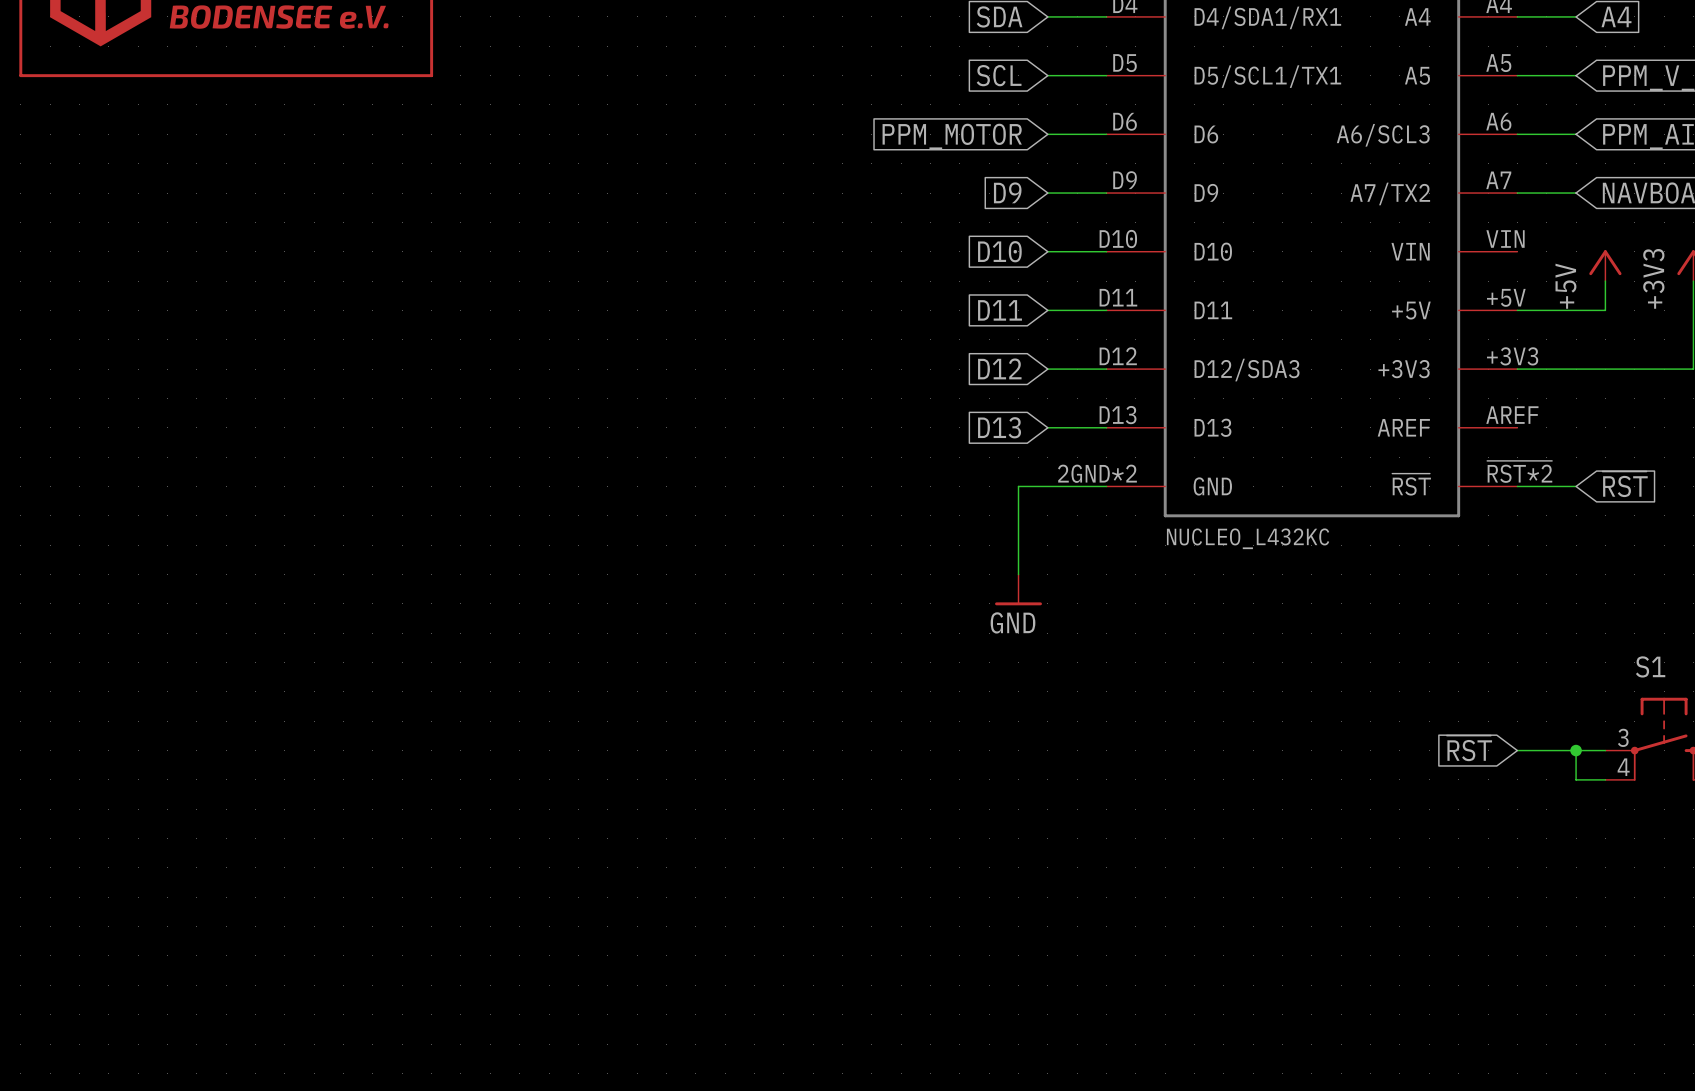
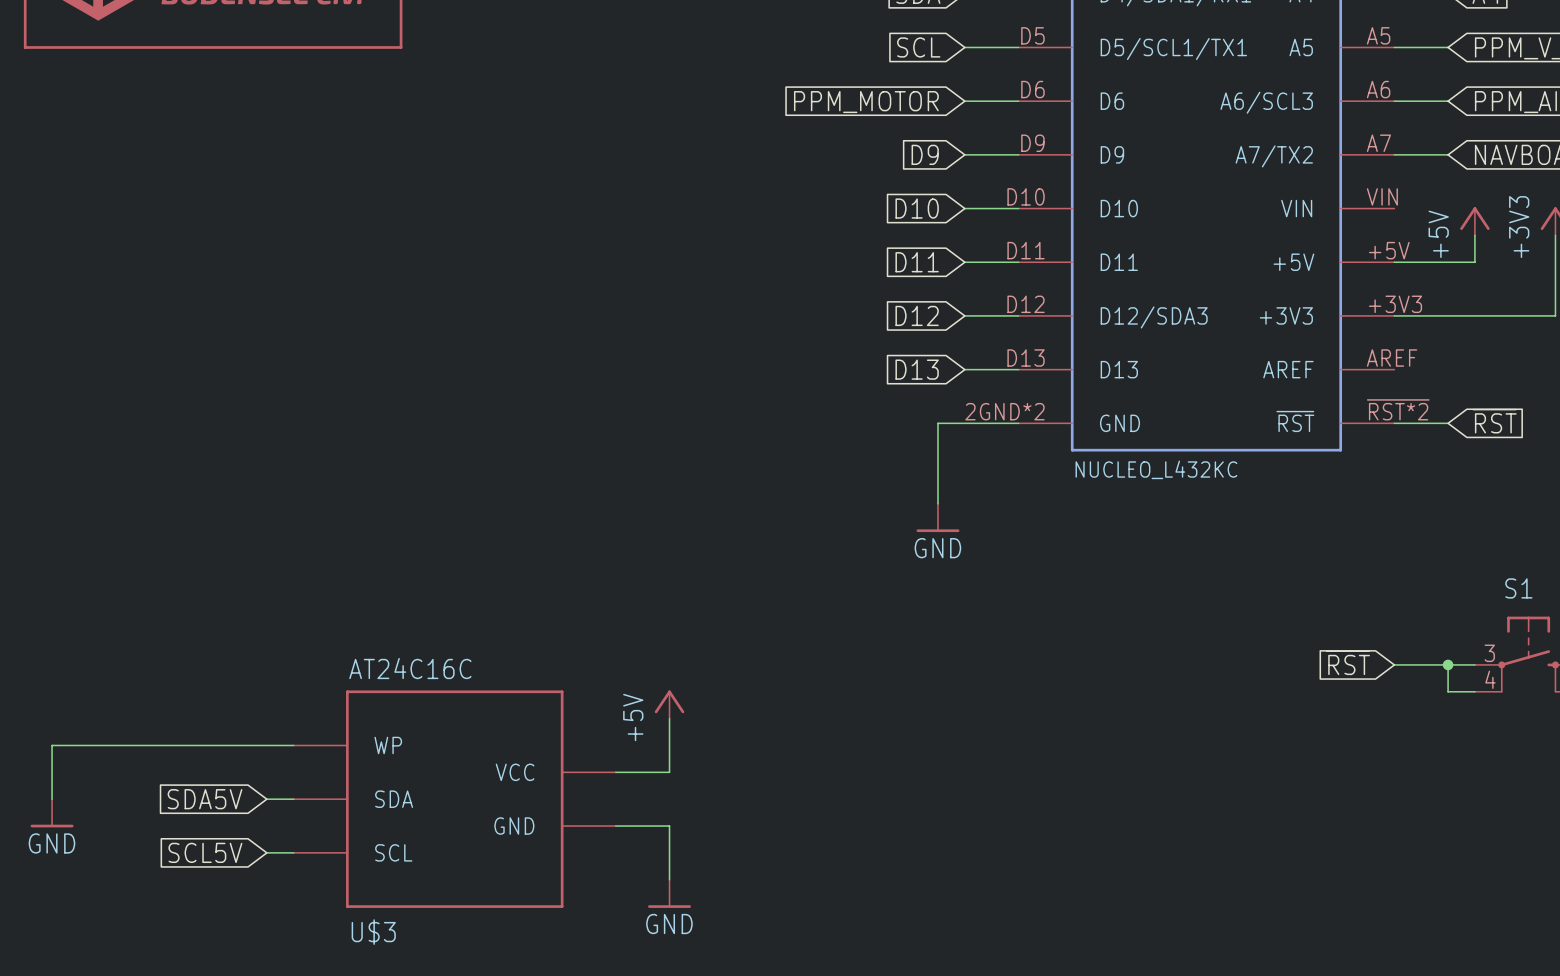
power symbol: none -> +5V (669, 704)
wire: none -> (669, 718) (669, 772) (615, 772)
wire: none -> (293, 745) (52, 745) (52, 799)
global label: none -> SDA5V (205, 799)
wire: none -> (266, 799) (293, 799)
U$3: none -> (454, 799)
power symbol: none -> GND (52, 813)
wire: none -> (615, 826) (669, 826) (669, 879)
global label: none -> SCL5V (205, 852)
wire: none -> (266, 852) (293, 852)
power symbol: none -> GND (669, 893)

